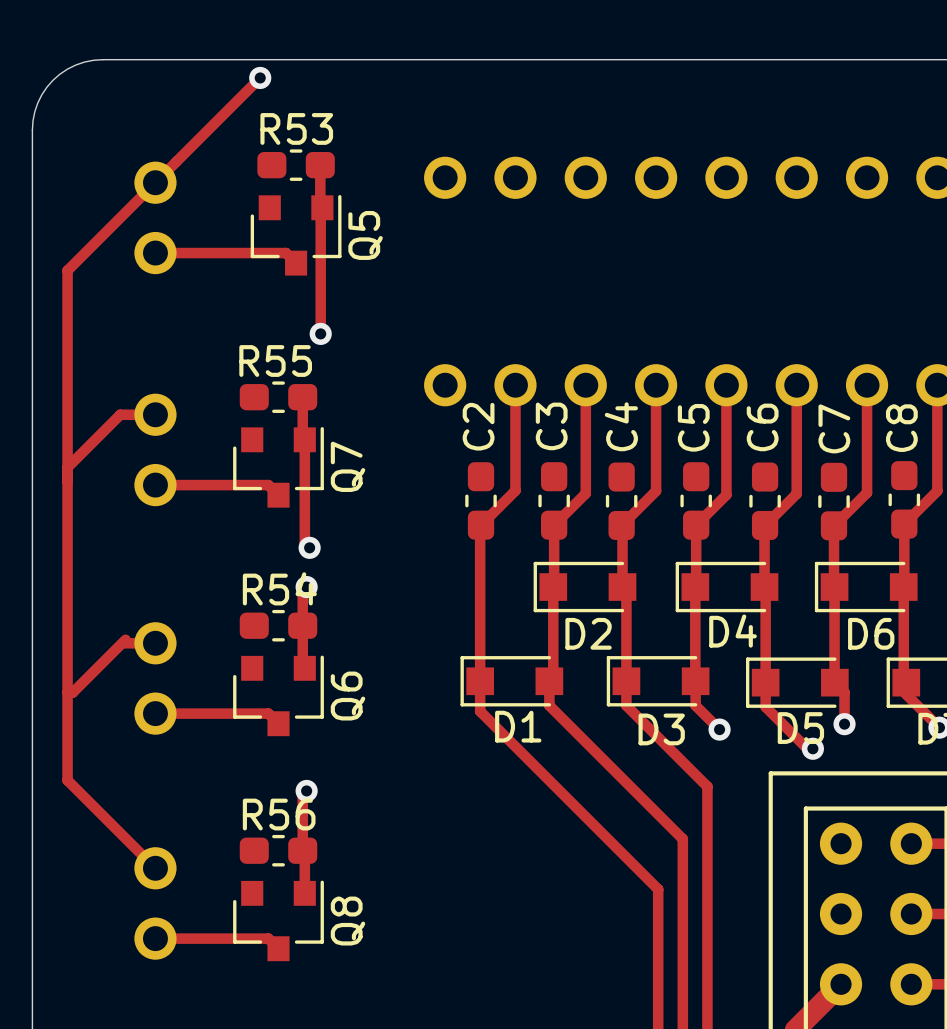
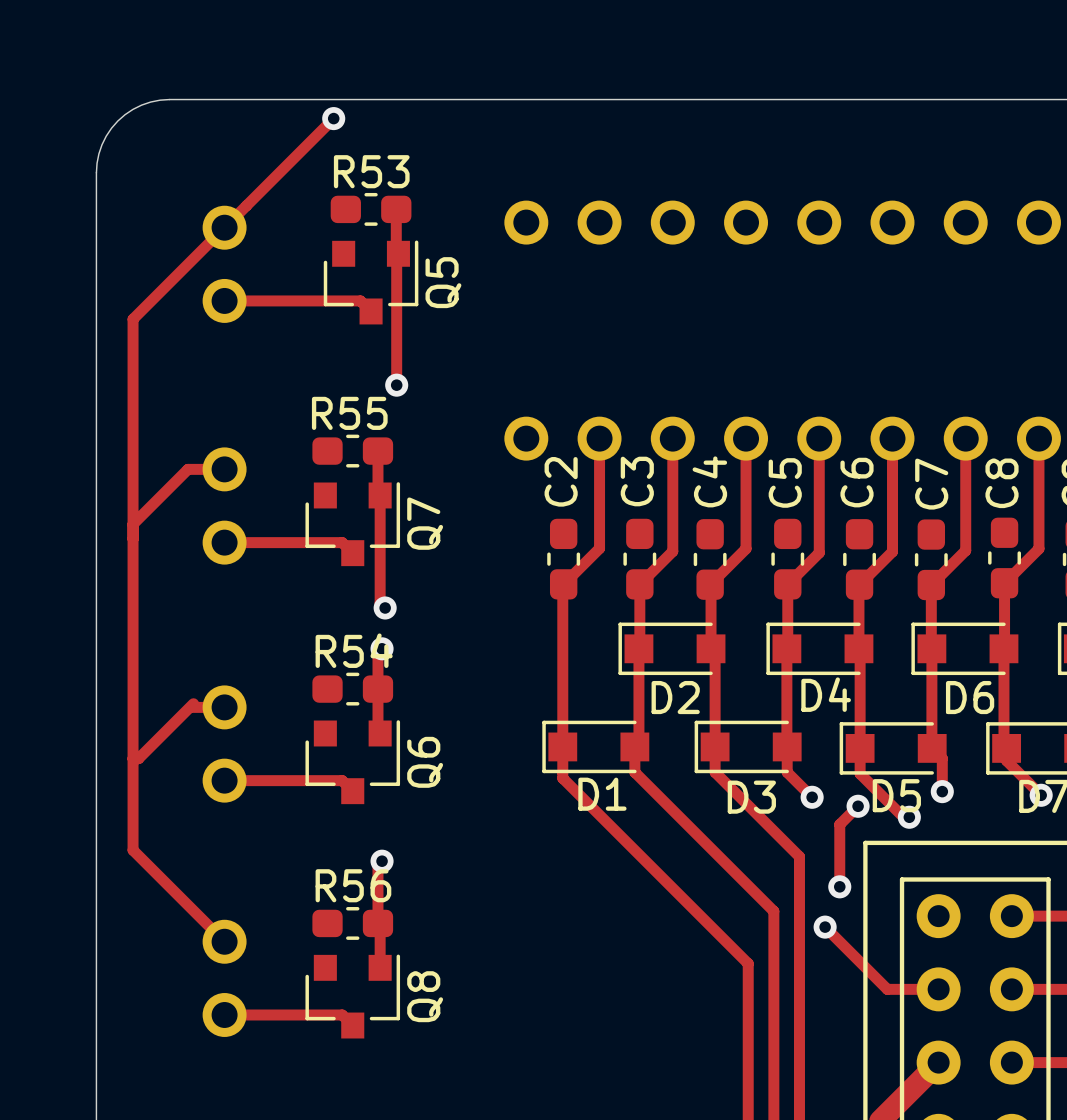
track: none -> (858, 806) (839, 824) (839, 886)
via: none -> (858, 806)
via: none -> (839, 886)
track: none -> (825, 927) (887, 989) (938, 989)
via: none -> (825, 927)

